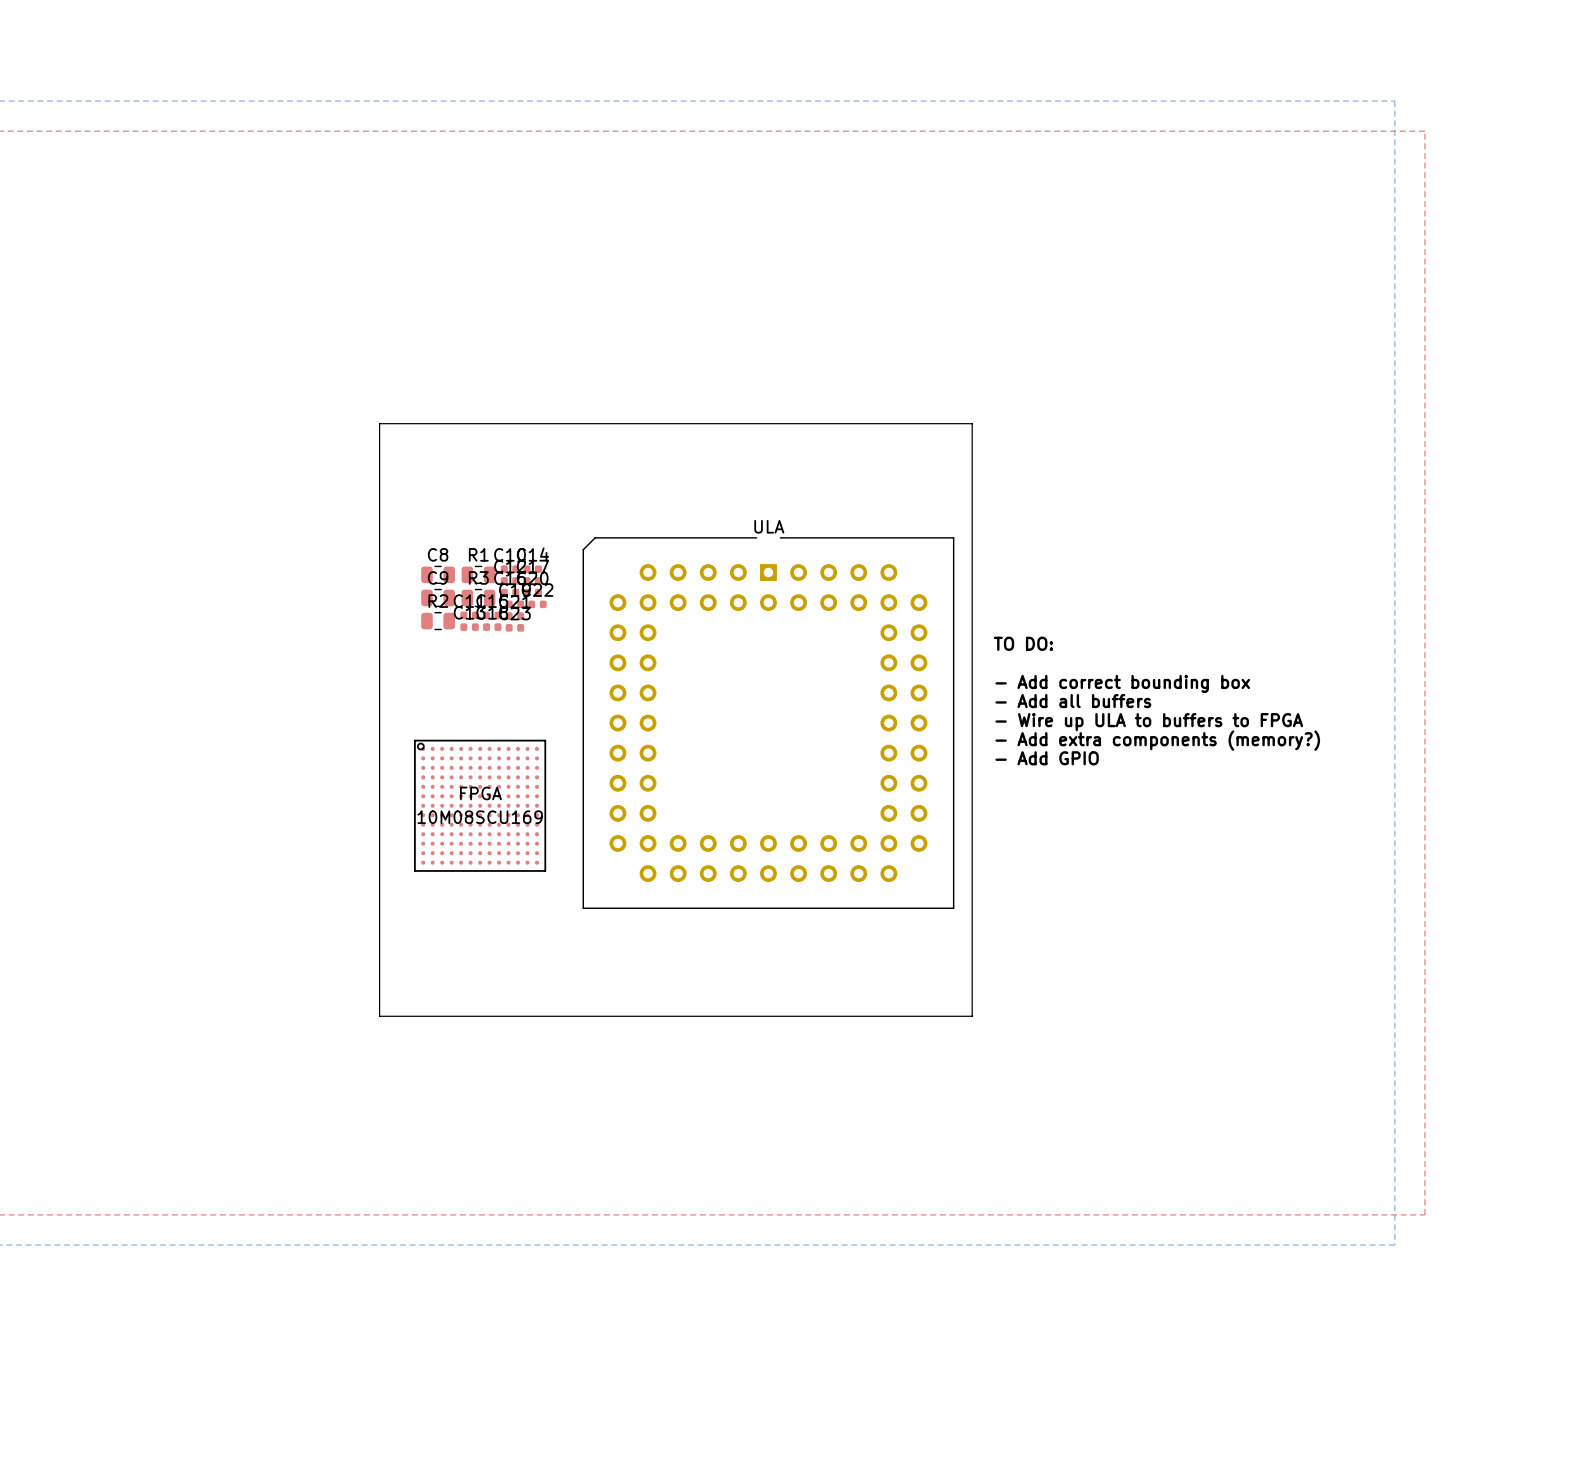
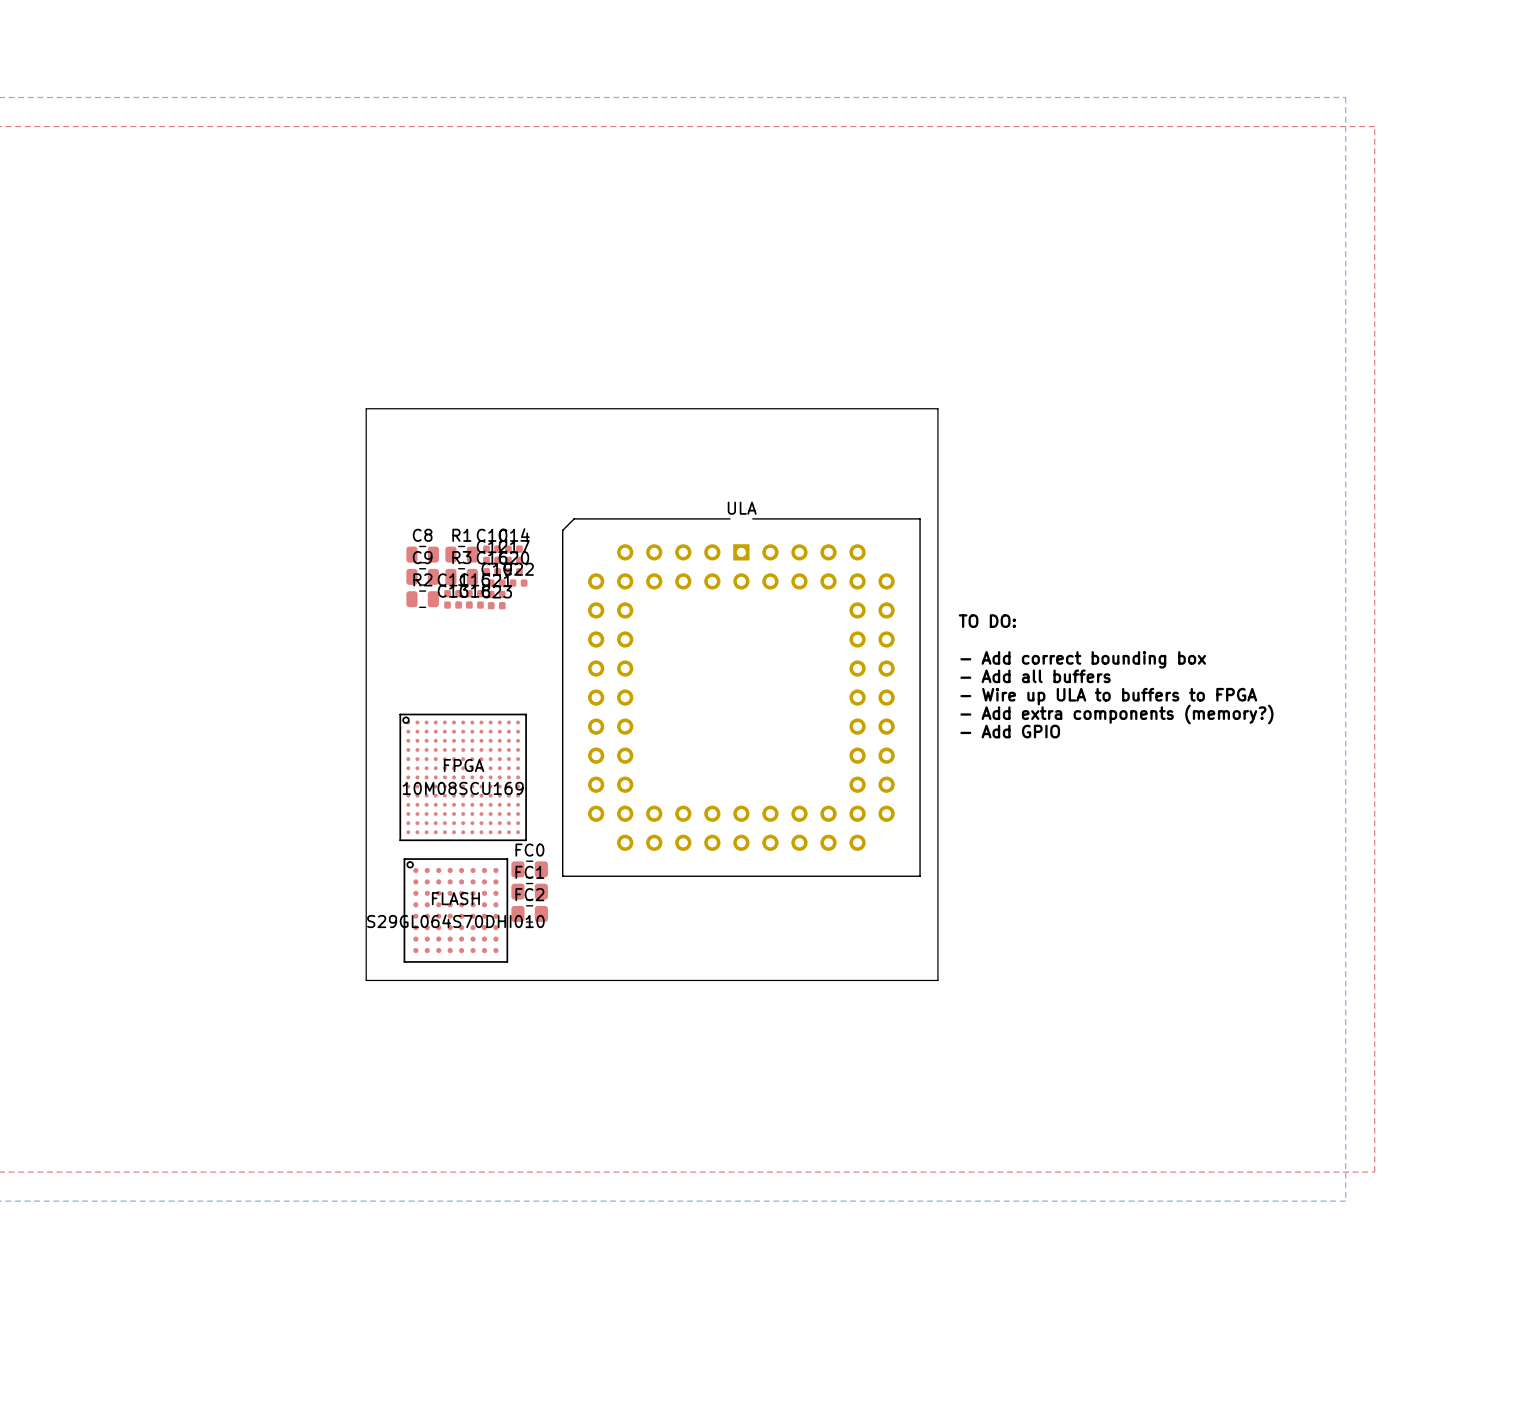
FC0: none -> (529, 869)
FC1: none -> (529, 891)
FLASH: none -> S29GL064S70DHI010 (455, 910)
FC2: none -> (529, 913)

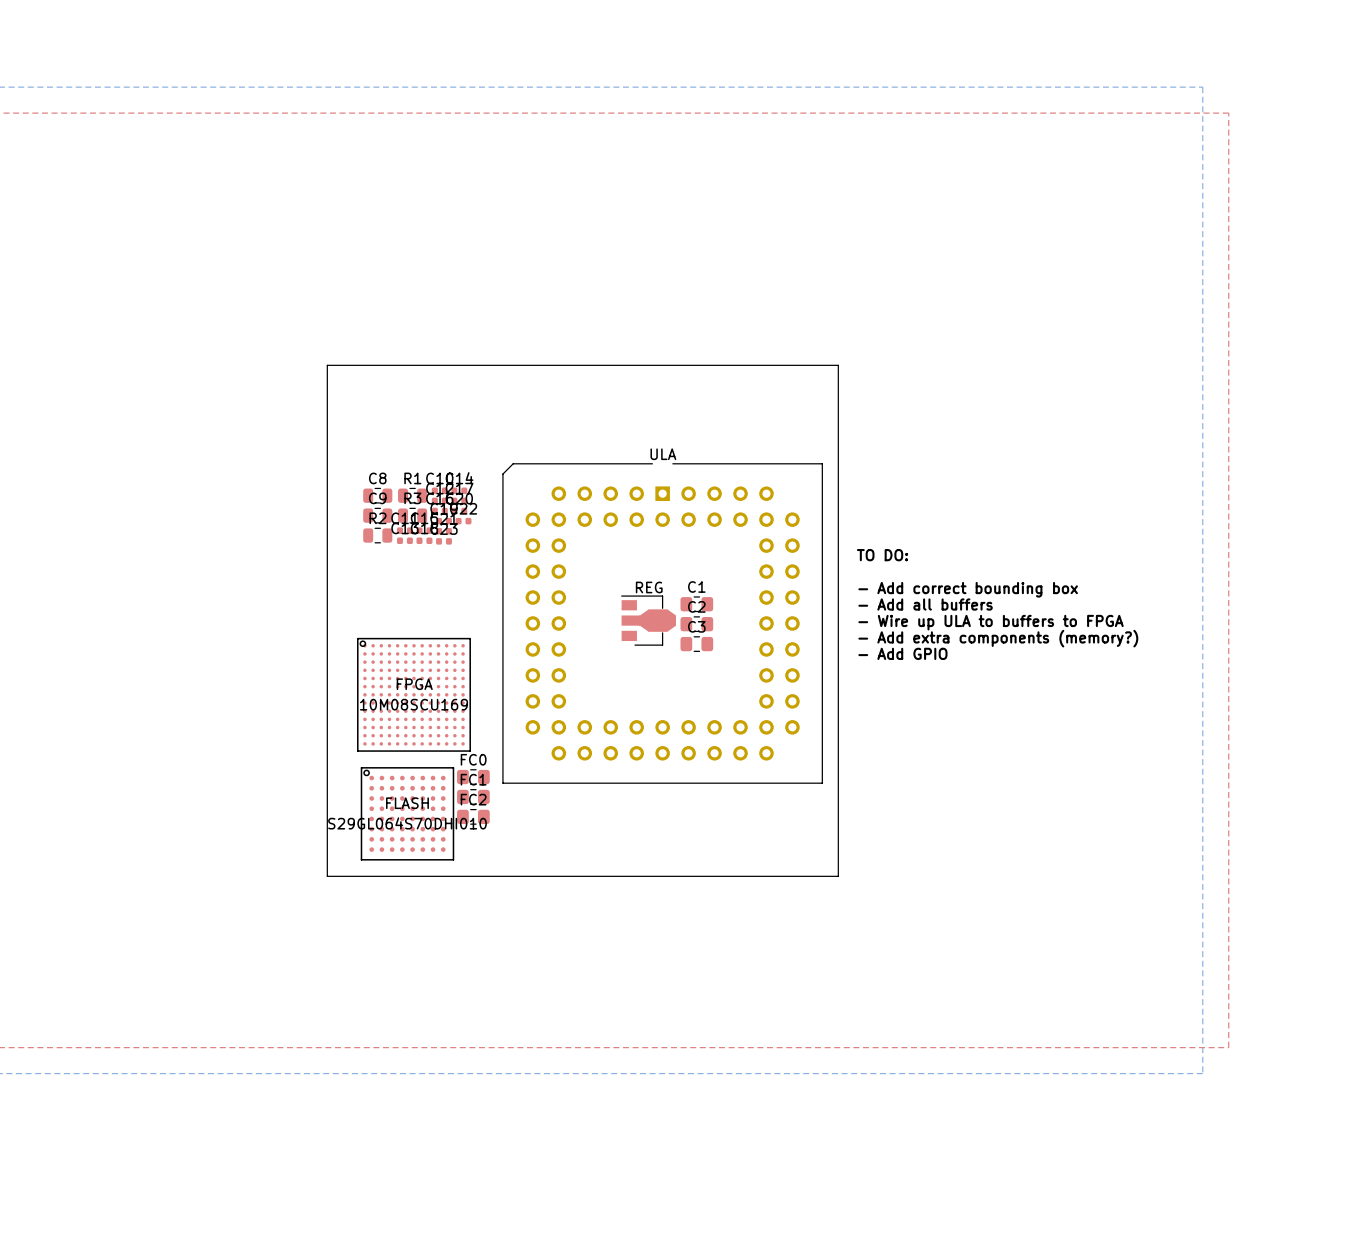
C1: none -> (696, 604)
REG: none -> (648, 620)
C2: none -> (696, 624)
C3: none -> (696, 644)

